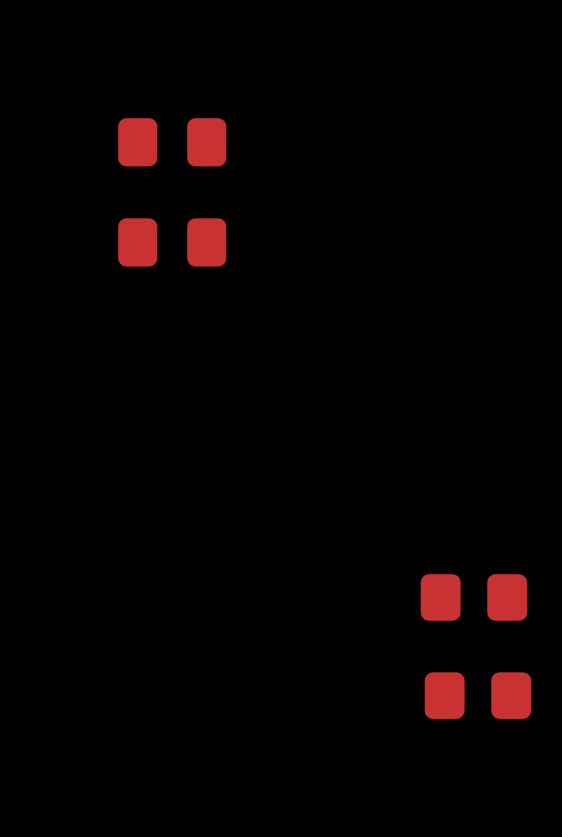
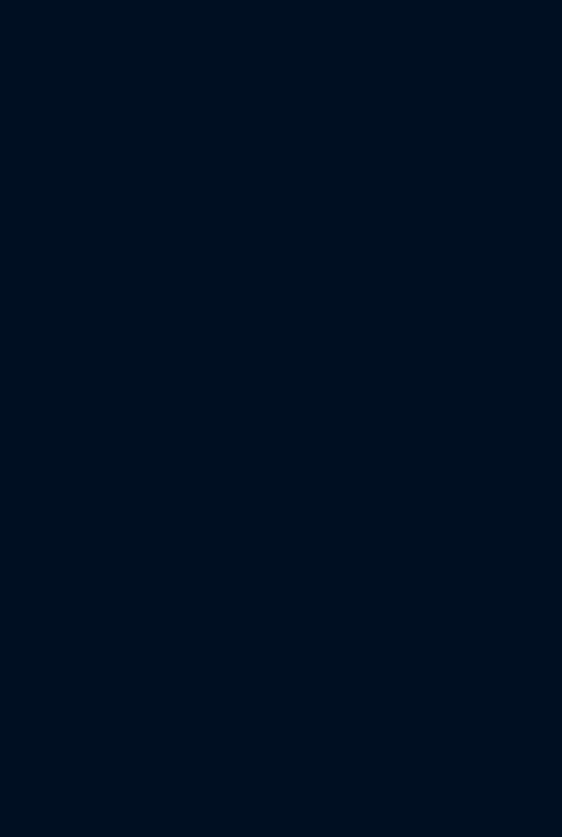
part: (172, 142) -> none
part: (172, 242) -> none
part: (473, 597) -> none
part: (477, 695) -> none

